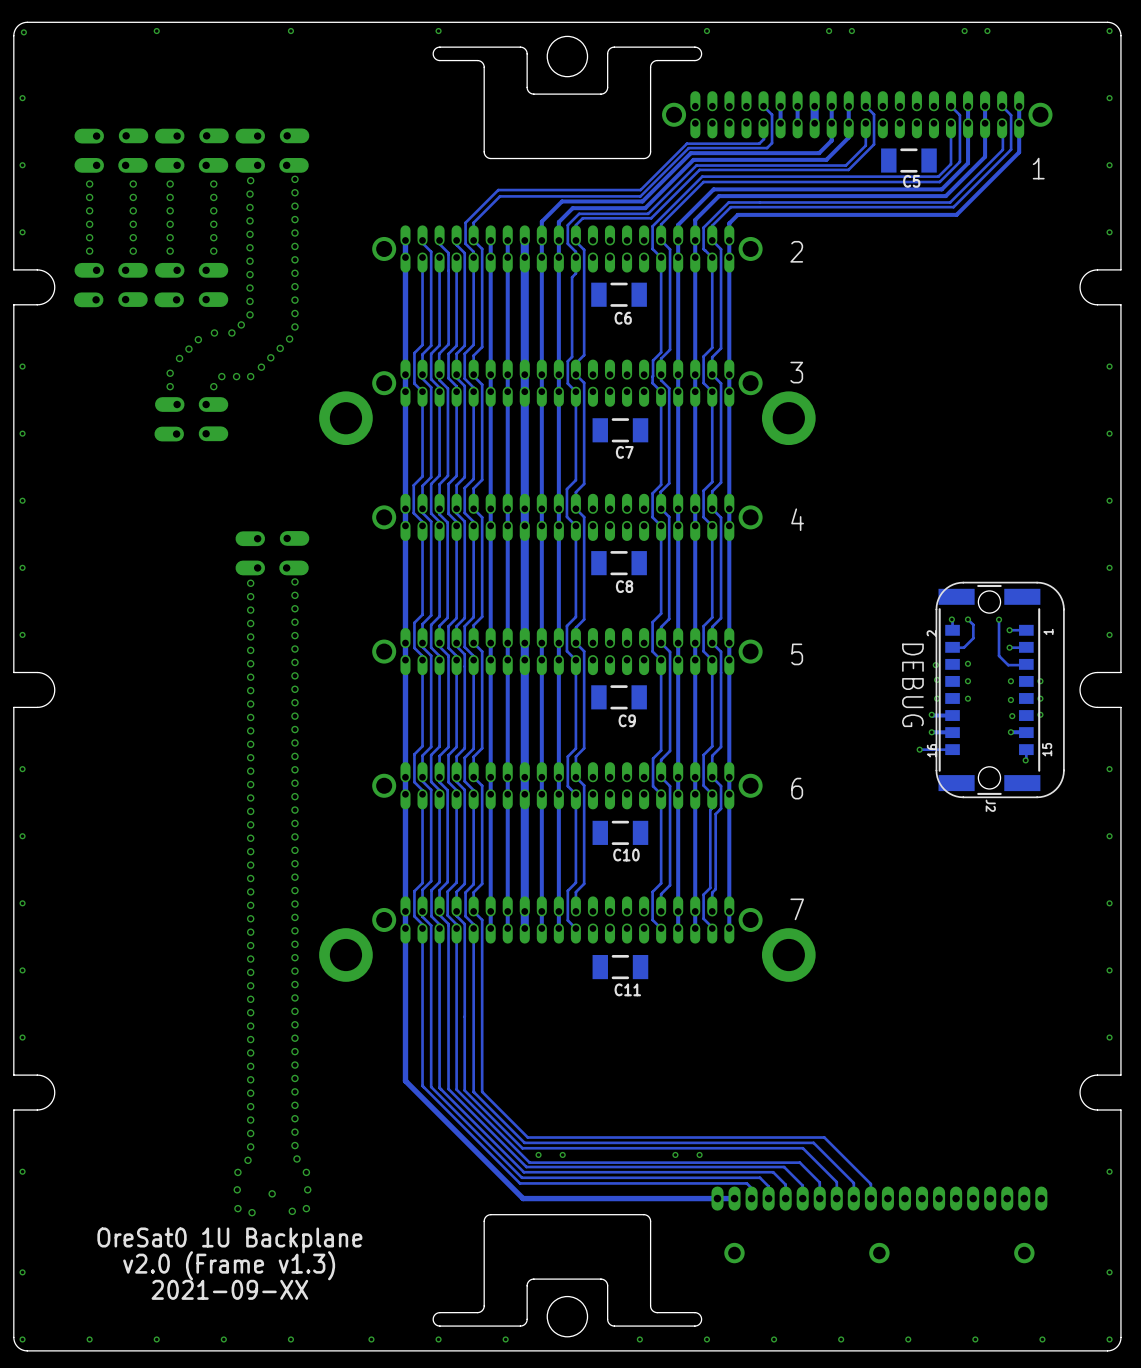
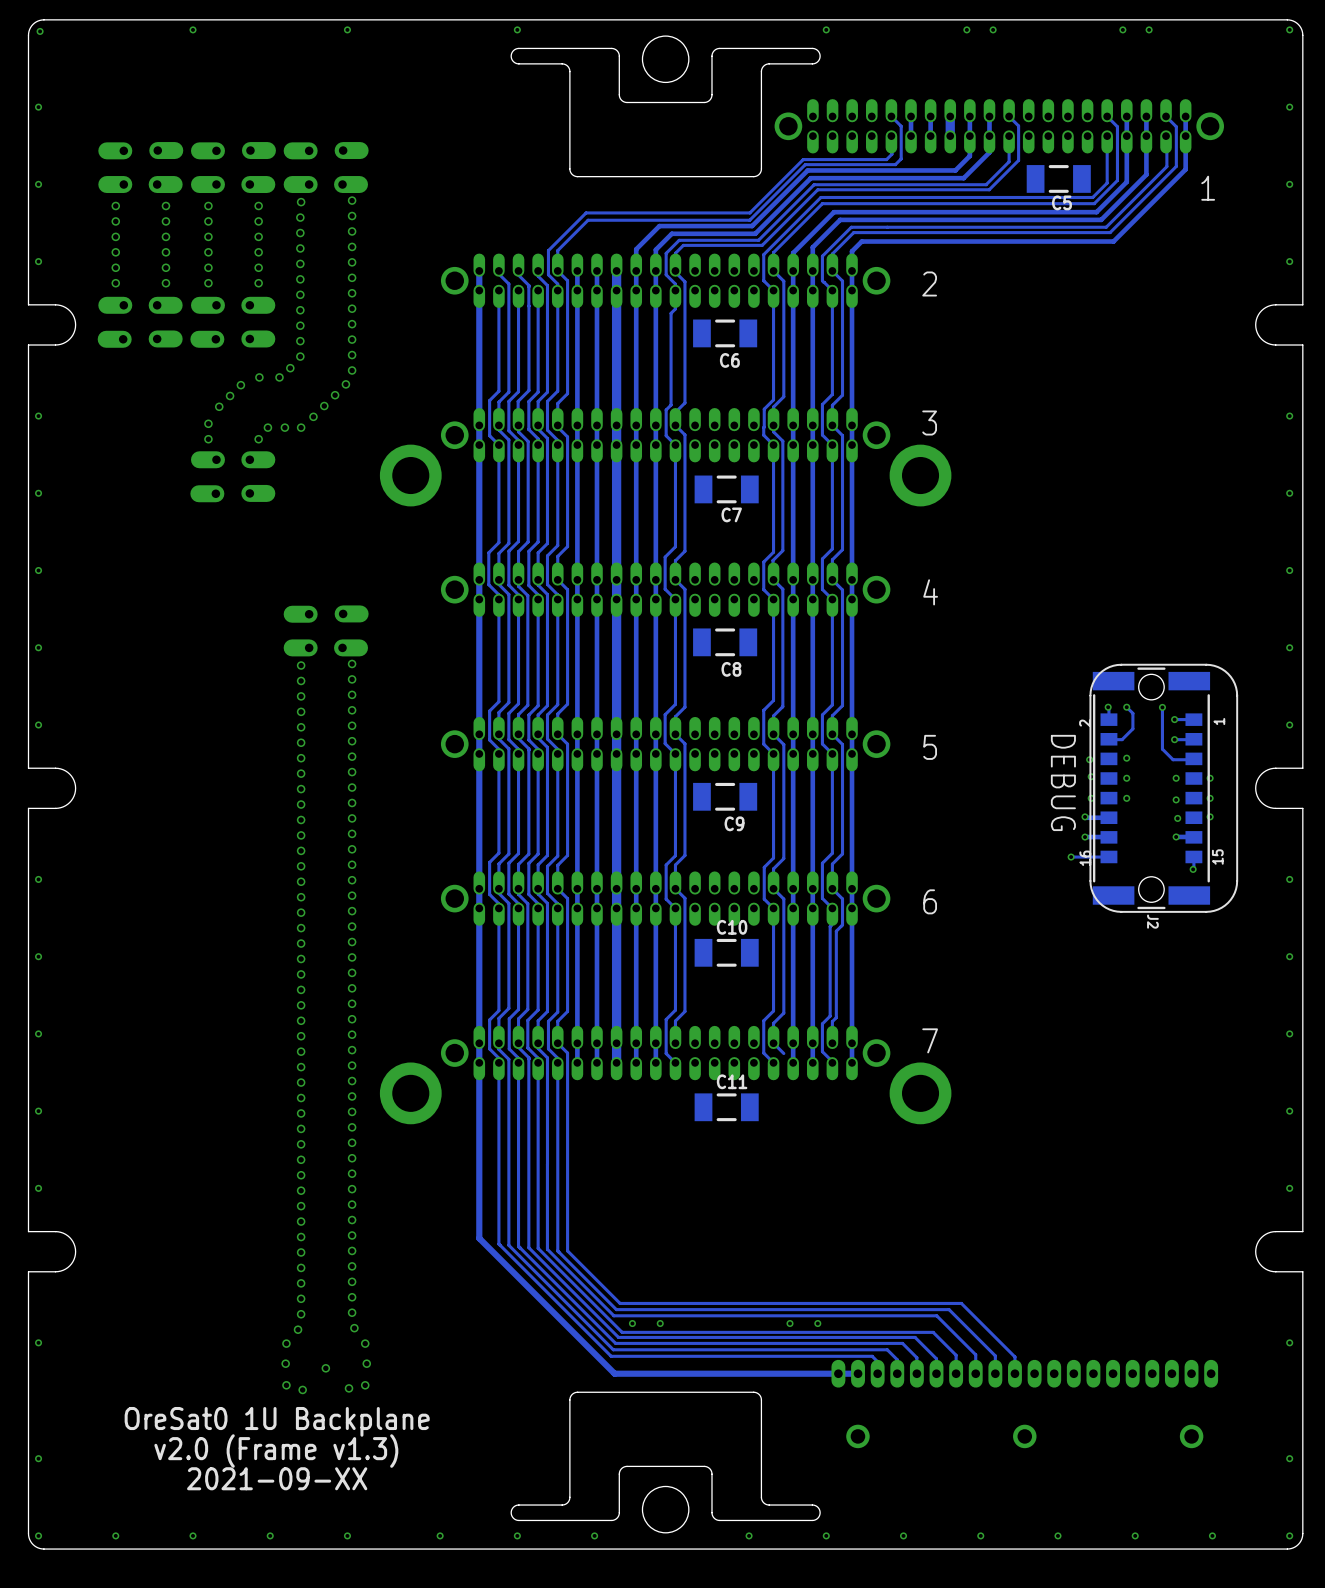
C10 name position: C10 (626, 855) -> C10 (732, 927)
track: none -> (773, 1043) (783, 1053)
C11 name position: C11 (627, 989) -> C11 (732, 1081)

